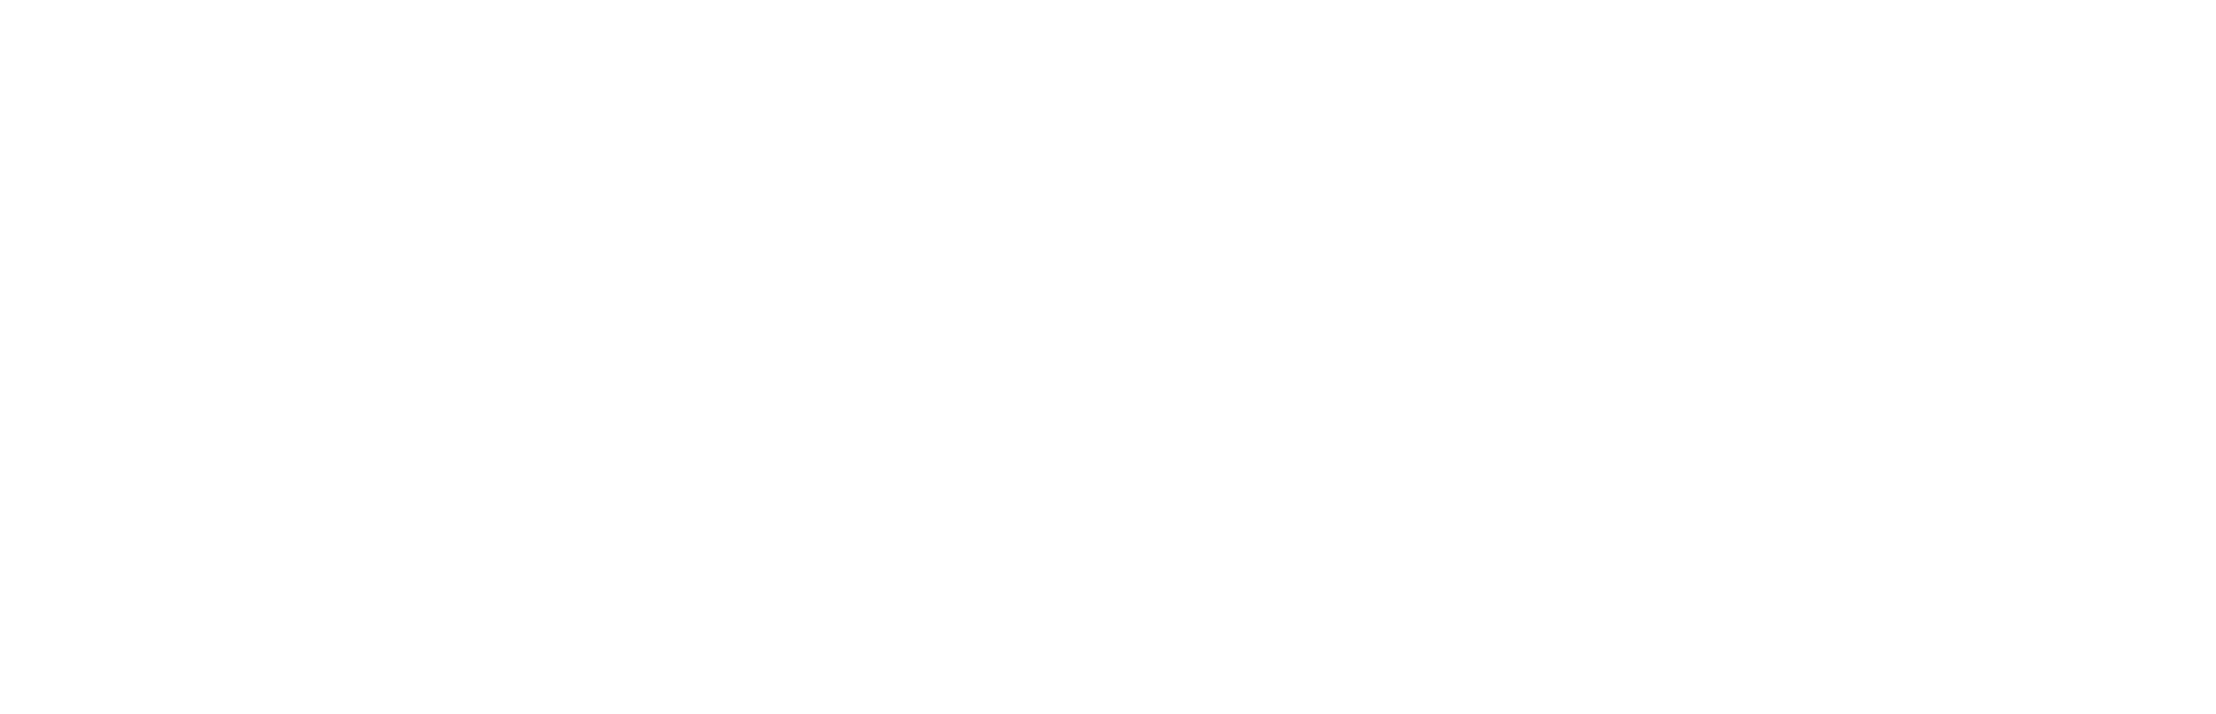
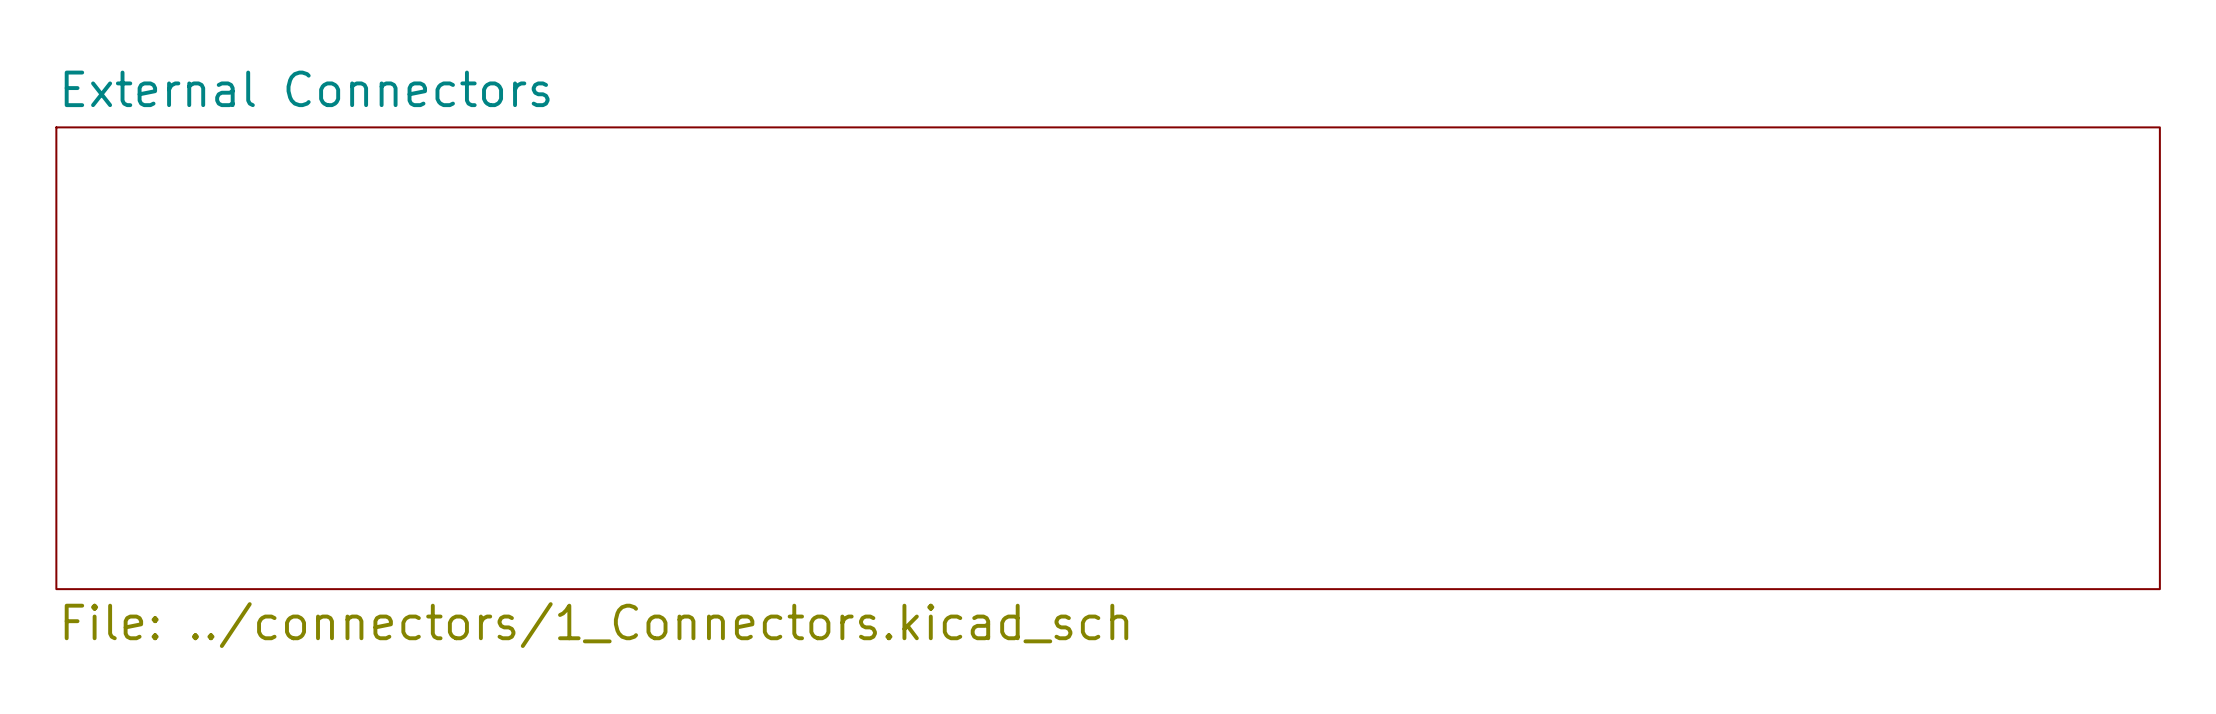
sheet External Connectors: none -> File: ../connectors/1_Connectors.kicad_sch (1108, 358)

